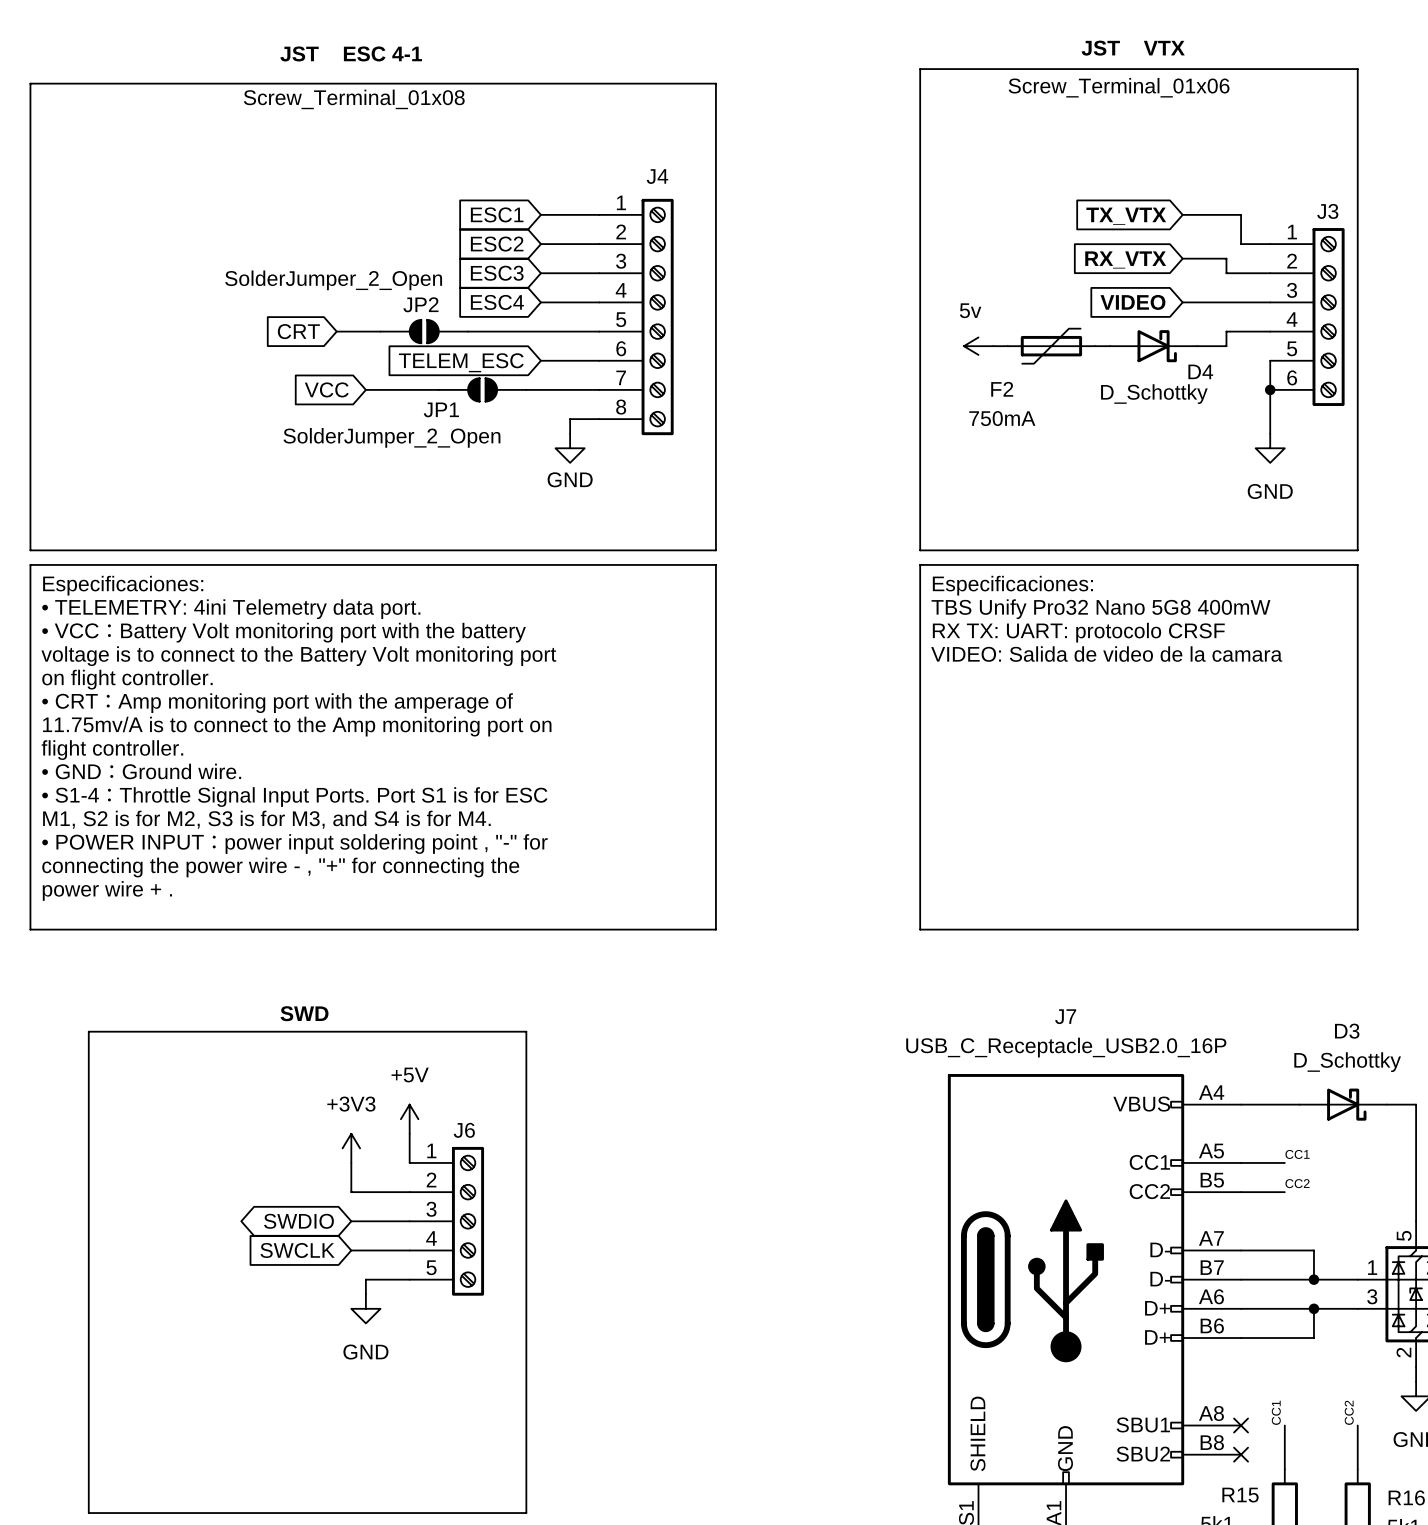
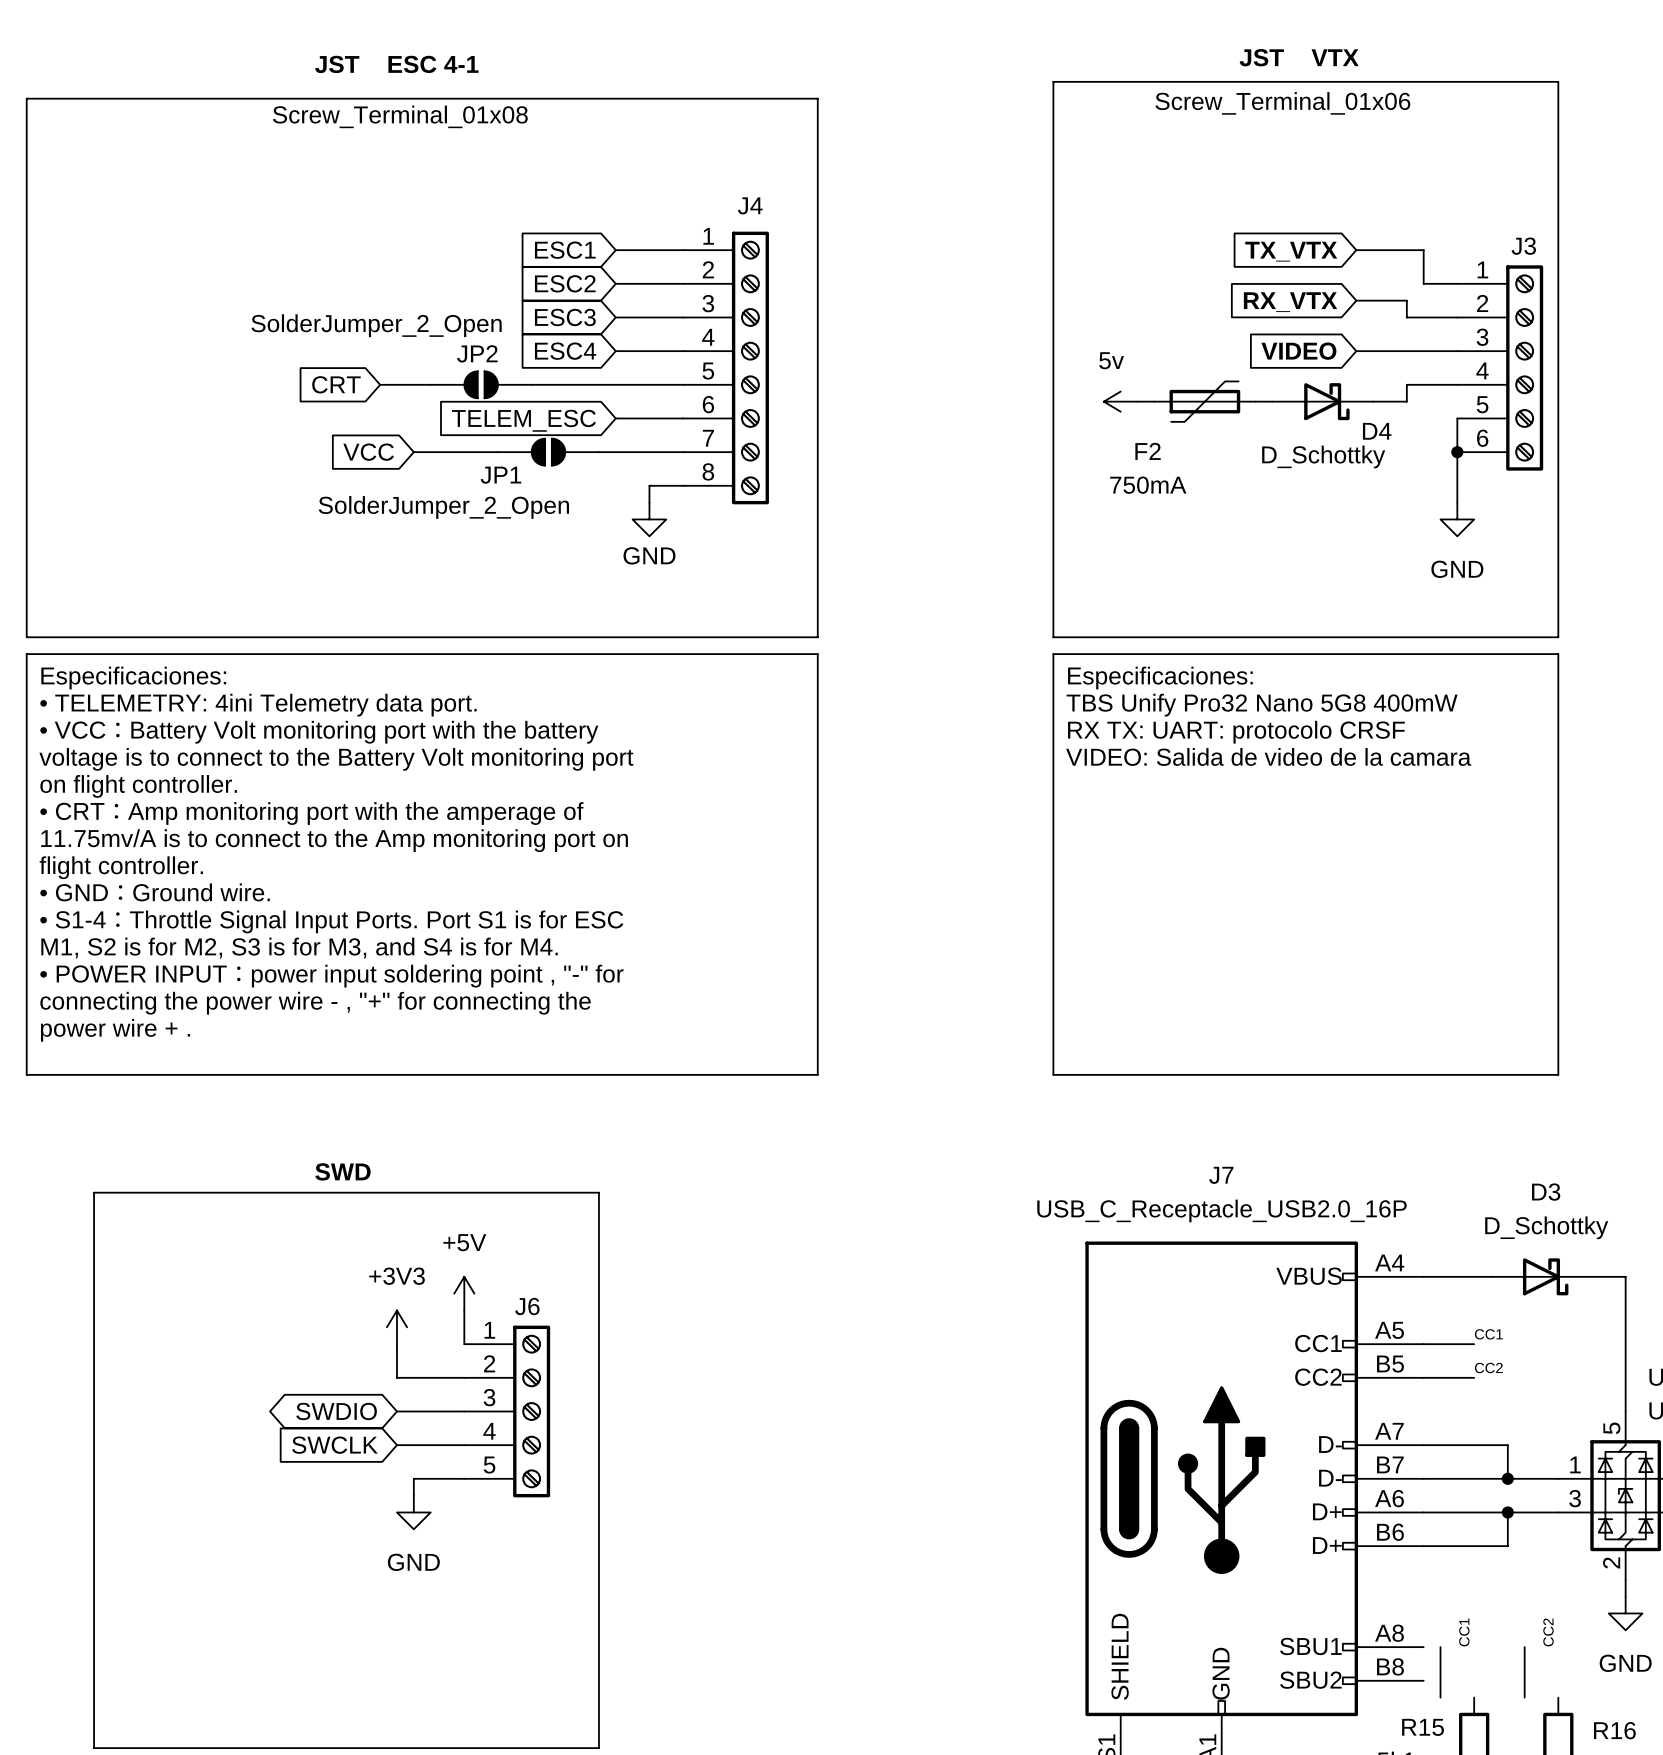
no-connect mark: (1241, 1425) -> none
wire: (1284, 1425) (1284, 1469) -> (1440, 1647) (1440, 1697)
wire: (1357, 1425) (1357, 1469) -> (1524, 1647) (1524, 1697)
no-connect mark: (1241, 1454) -> none

